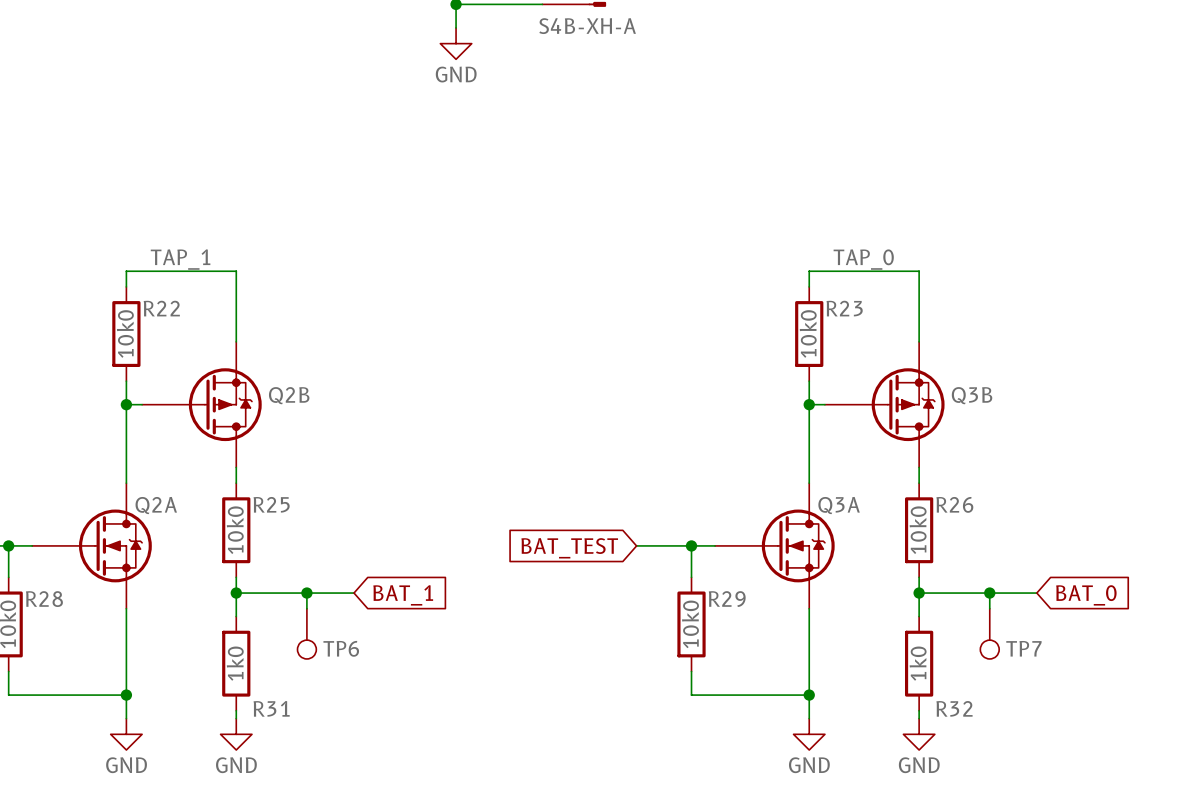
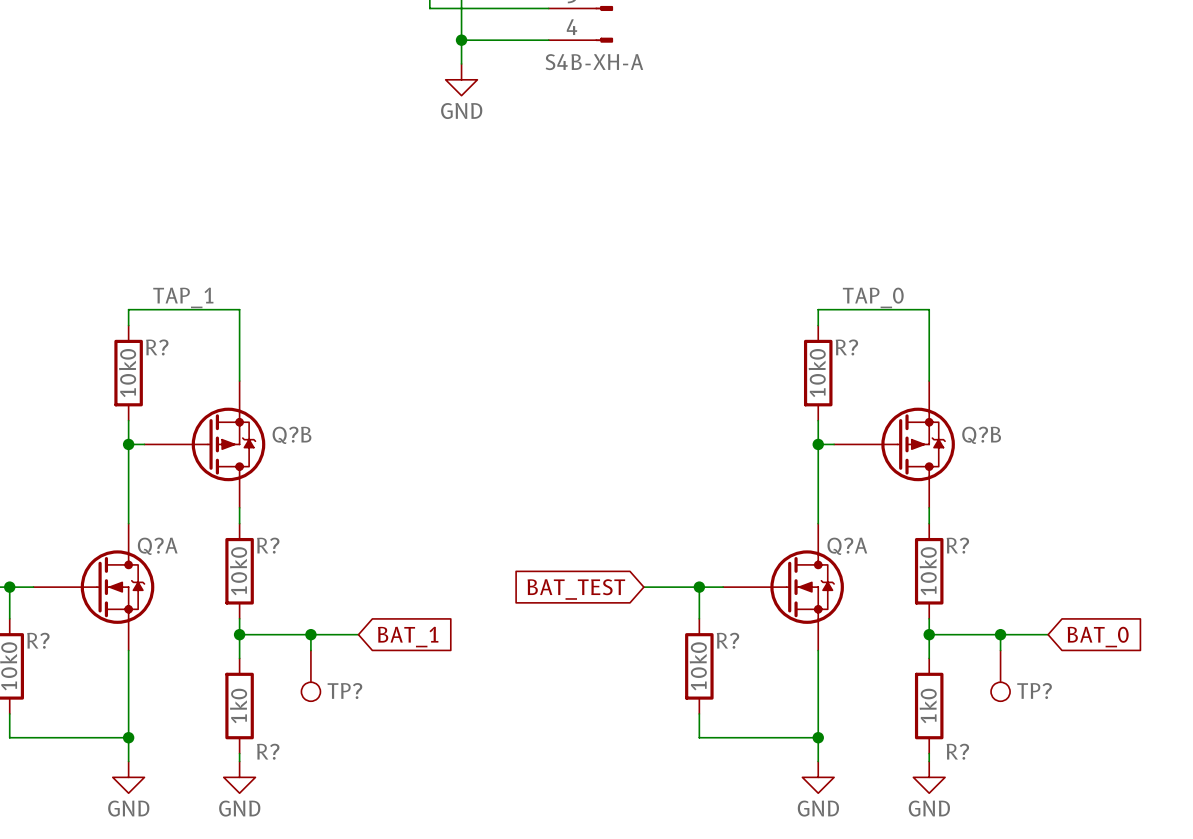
R22 name: R22 (161, 308) -> R? (157, 347)
R23 name: R23 (844, 308) -> R? (846, 347)
Q2B name: Q2B (289, 395) -> Q?B (291, 435)
Q3B name: Q3B (972, 395) -> Q?B (981, 435)
R25 name: R25 (271, 504) -> R? (268, 545)
R26 name: R26 (954, 504) -> R? (957, 545)
Q2A name: Q2A (156, 505) -> Q?A (157, 546)
Q3A name: Q3A (839, 505) -> Q?A (847, 546)
R28 name: R28 (44, 599) -> R? (38, 640)
R29 name: R29 (727, 599) -> R? (728, 640)
TP6 name: TP6 (341, 648) -> TP? (344, 691)
TP7 name: TP7 (1023, 648) -> TP? (1034, 691)
R31 name: R31 (271, 708) -> R? (268, 751)
R32 name: R32 (954, 708) -> R? (957, 751)

